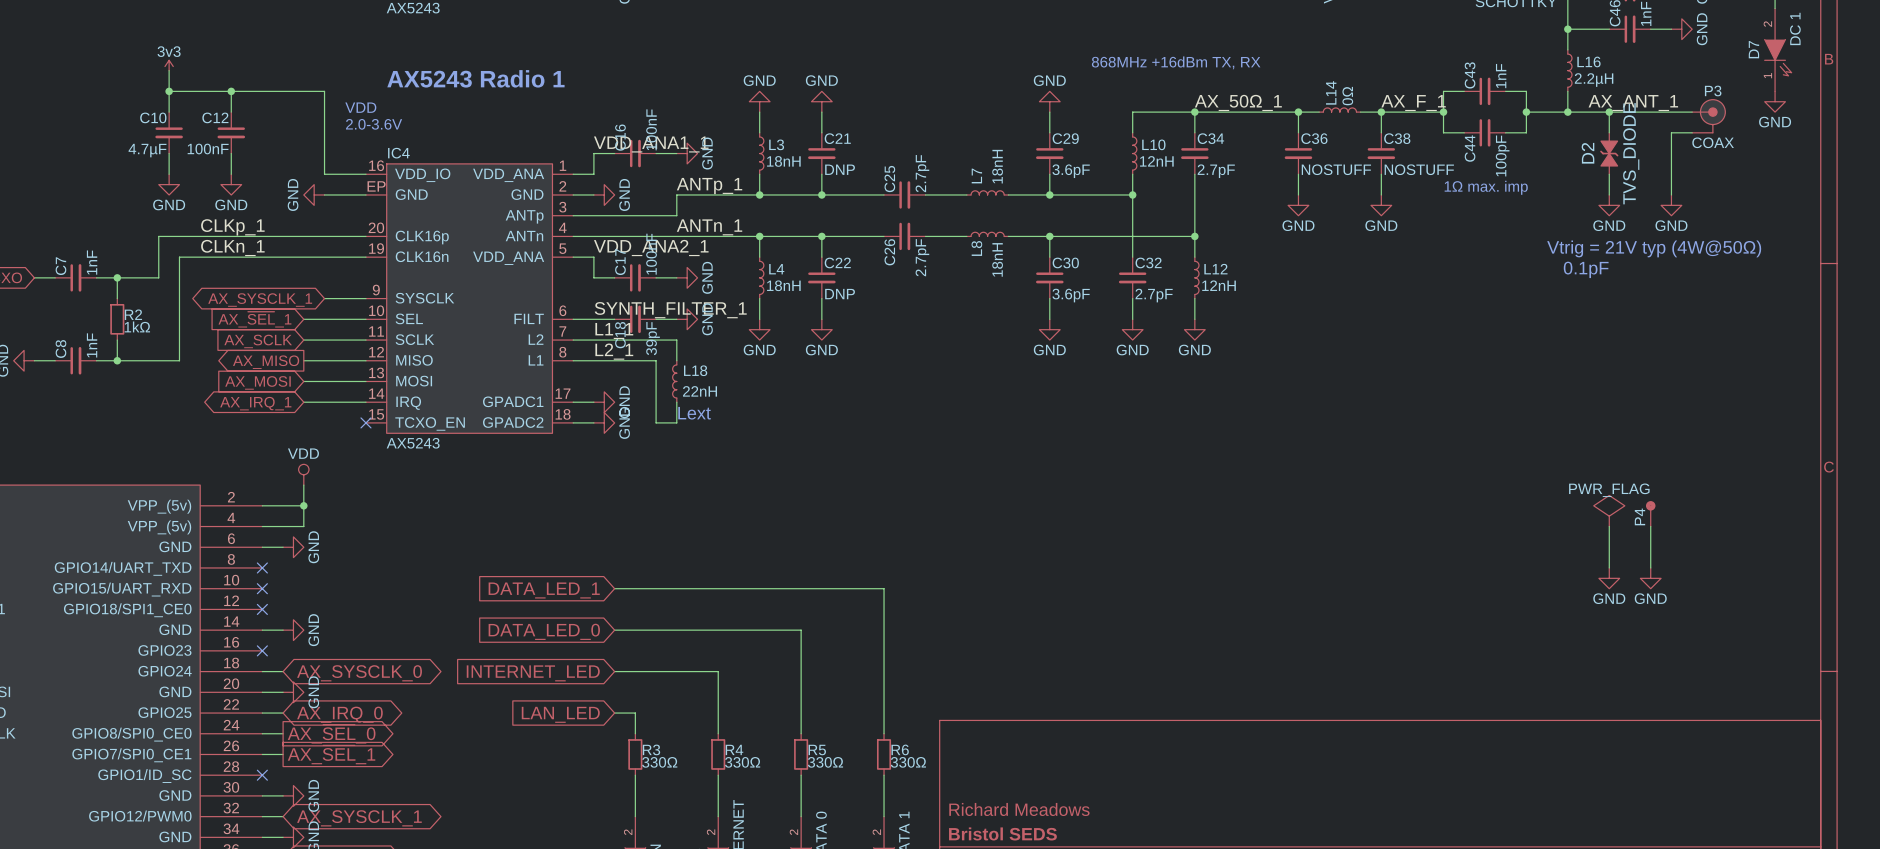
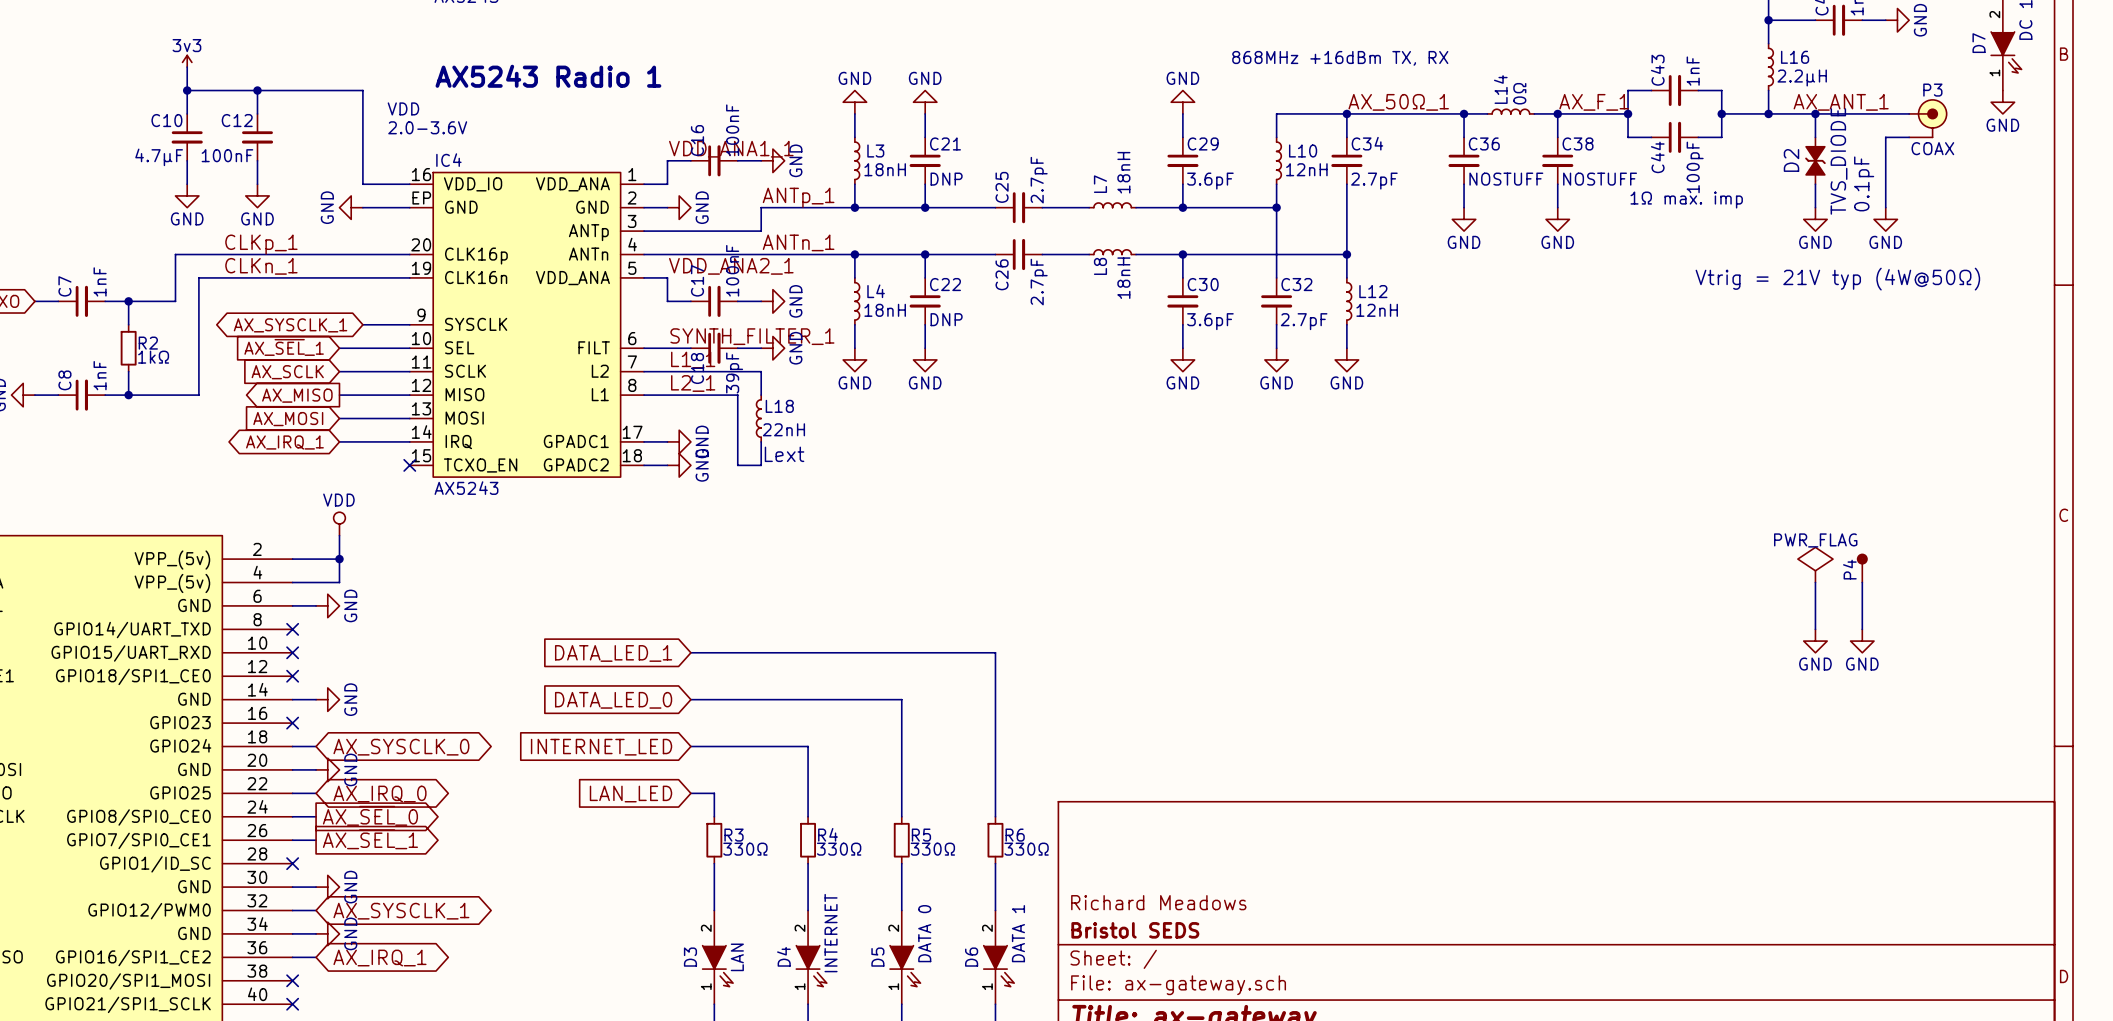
D2 text: none -> 0.1pF (1864, 183)
text: Vtrig = 21V typ (4W@50Ω) (1654, 248) -> none
D2 text: none -> Vtrig = 21V typ (4W@50Ω) (1837, 279)
text: 0.1pF (1586, 269) -> none

